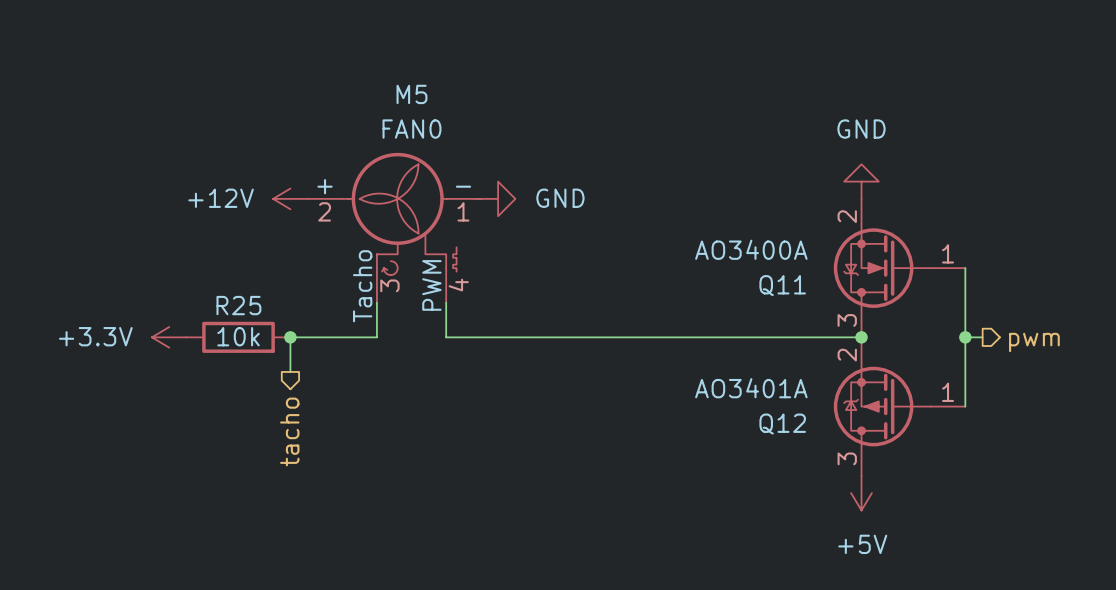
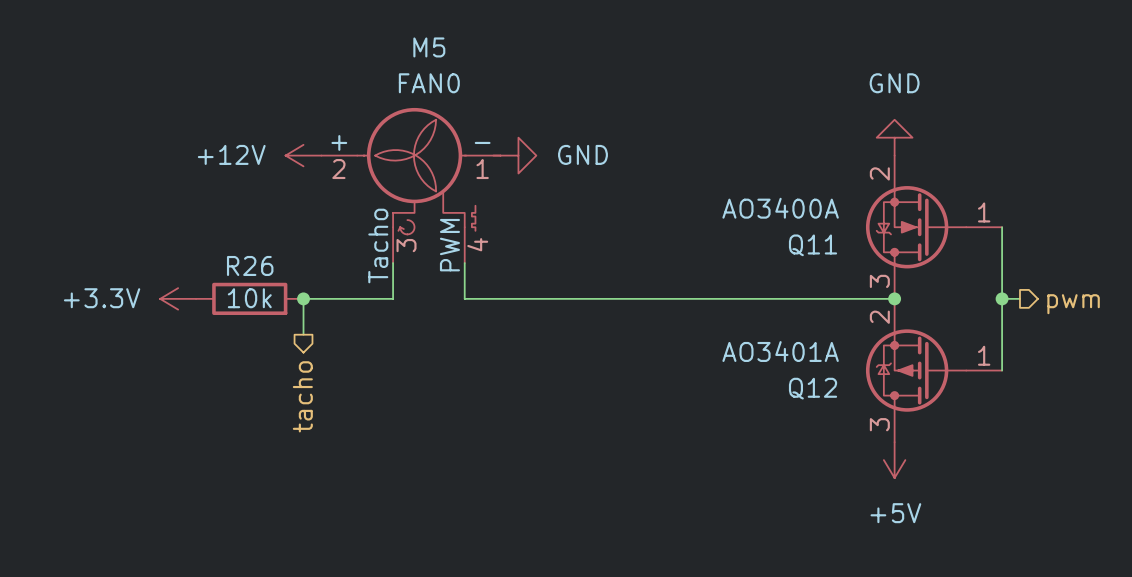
R25 name: R25 (238, 305) -> R26 (250, 265)

